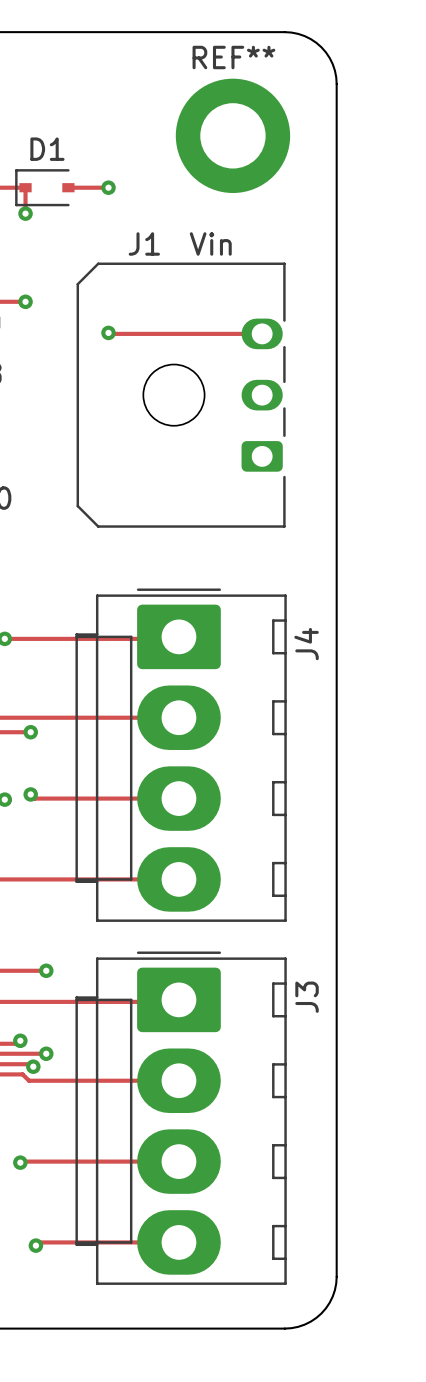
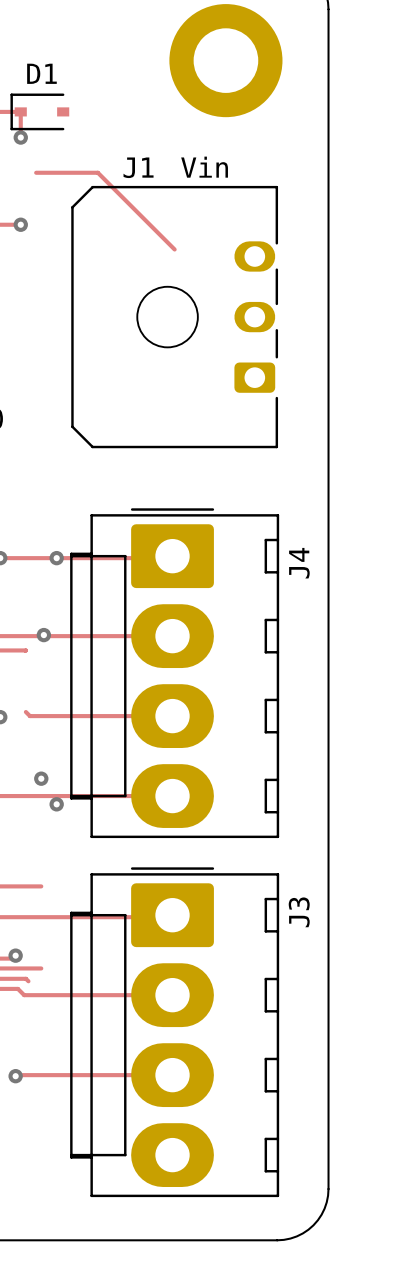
track: (68, 187) (108, 187) -> none
via: (108, 187) -> none
track: none -> (36, 172) (97, 172) (174, 249)
track: (108, 332) (262, 333) -> none
via: (108, 332) -> none
via: none -> (56, 558)
via position: (30, 732) -> (43, 635)
via: (30, 794) -> none
via: none -> (41, 778)
via: none -> (56, 804)
via: (46, 970) -> none
via: (46, 1053) -> none
via: (33, 1066) -> none
track: (178, 1242) (39, 1242) (35, 1245) -> none
via: (35, 1245) -> none

